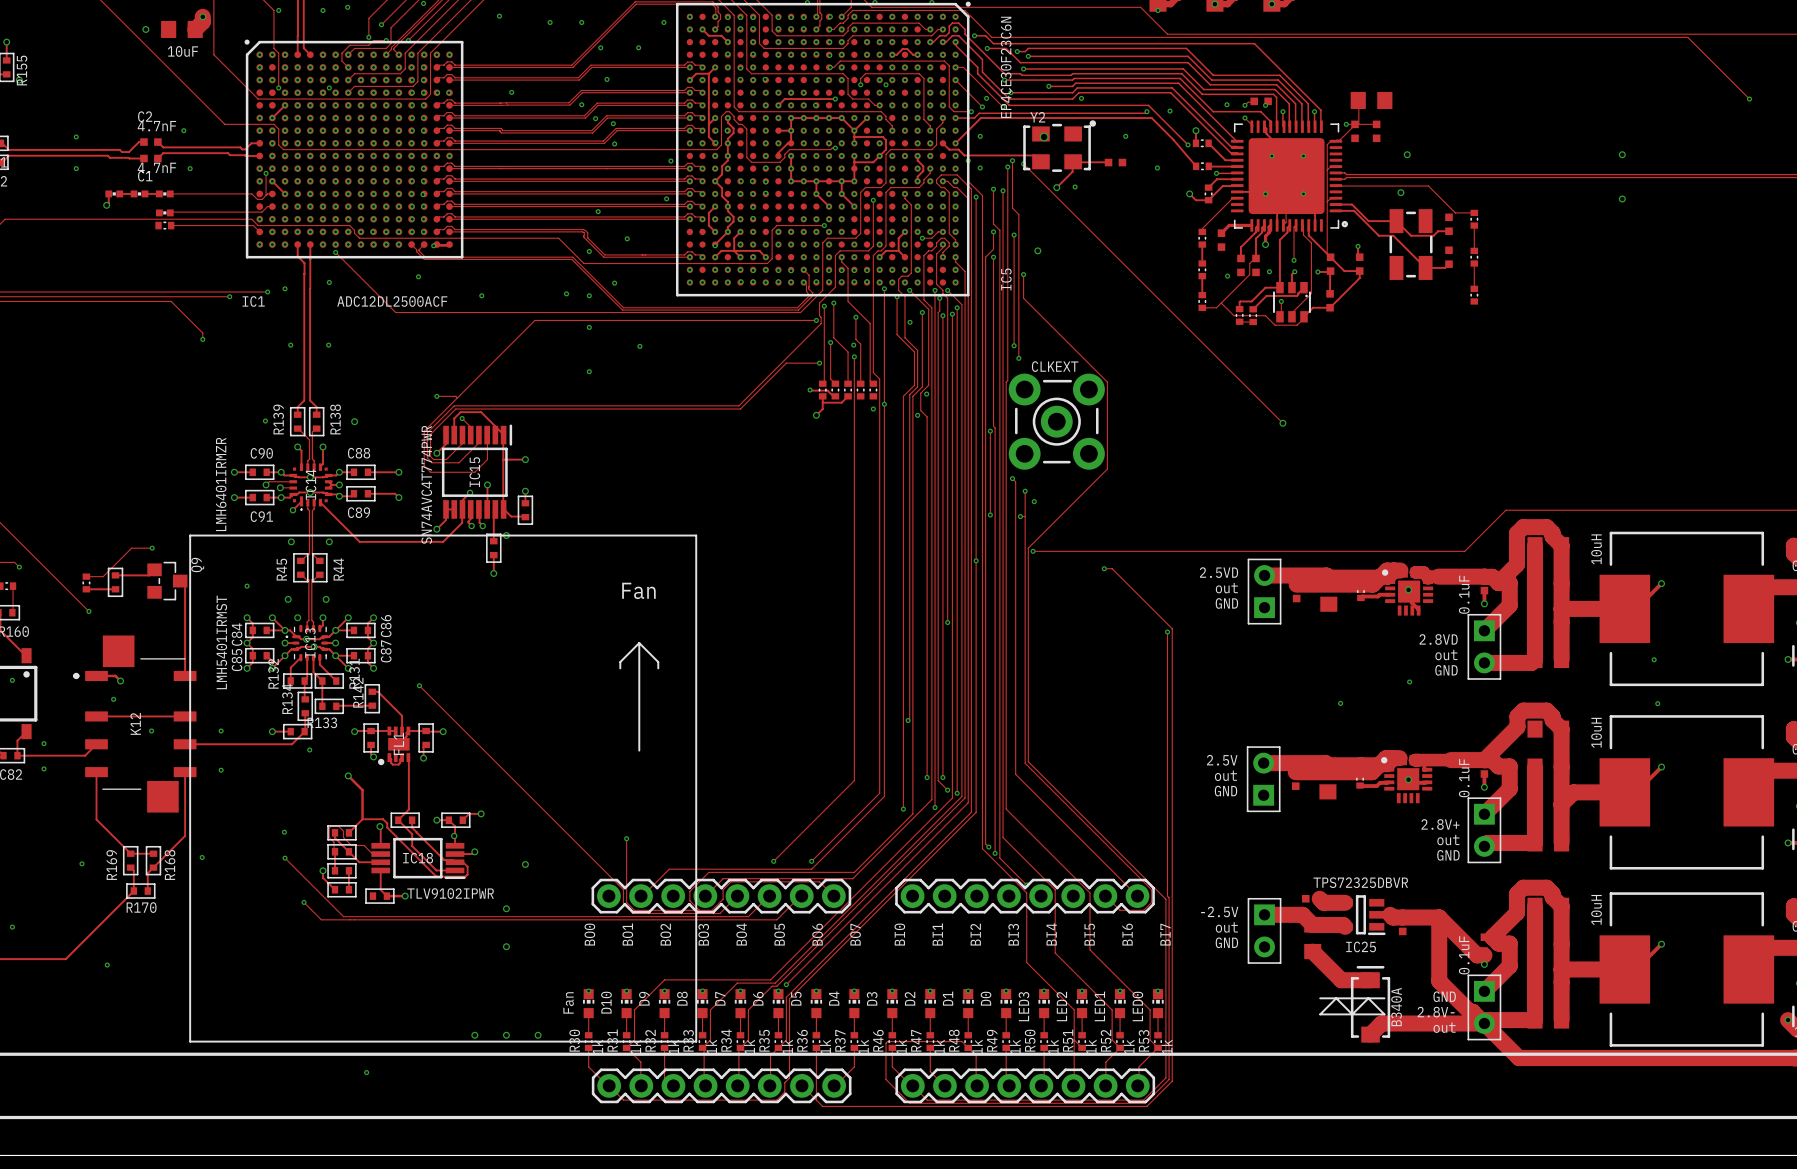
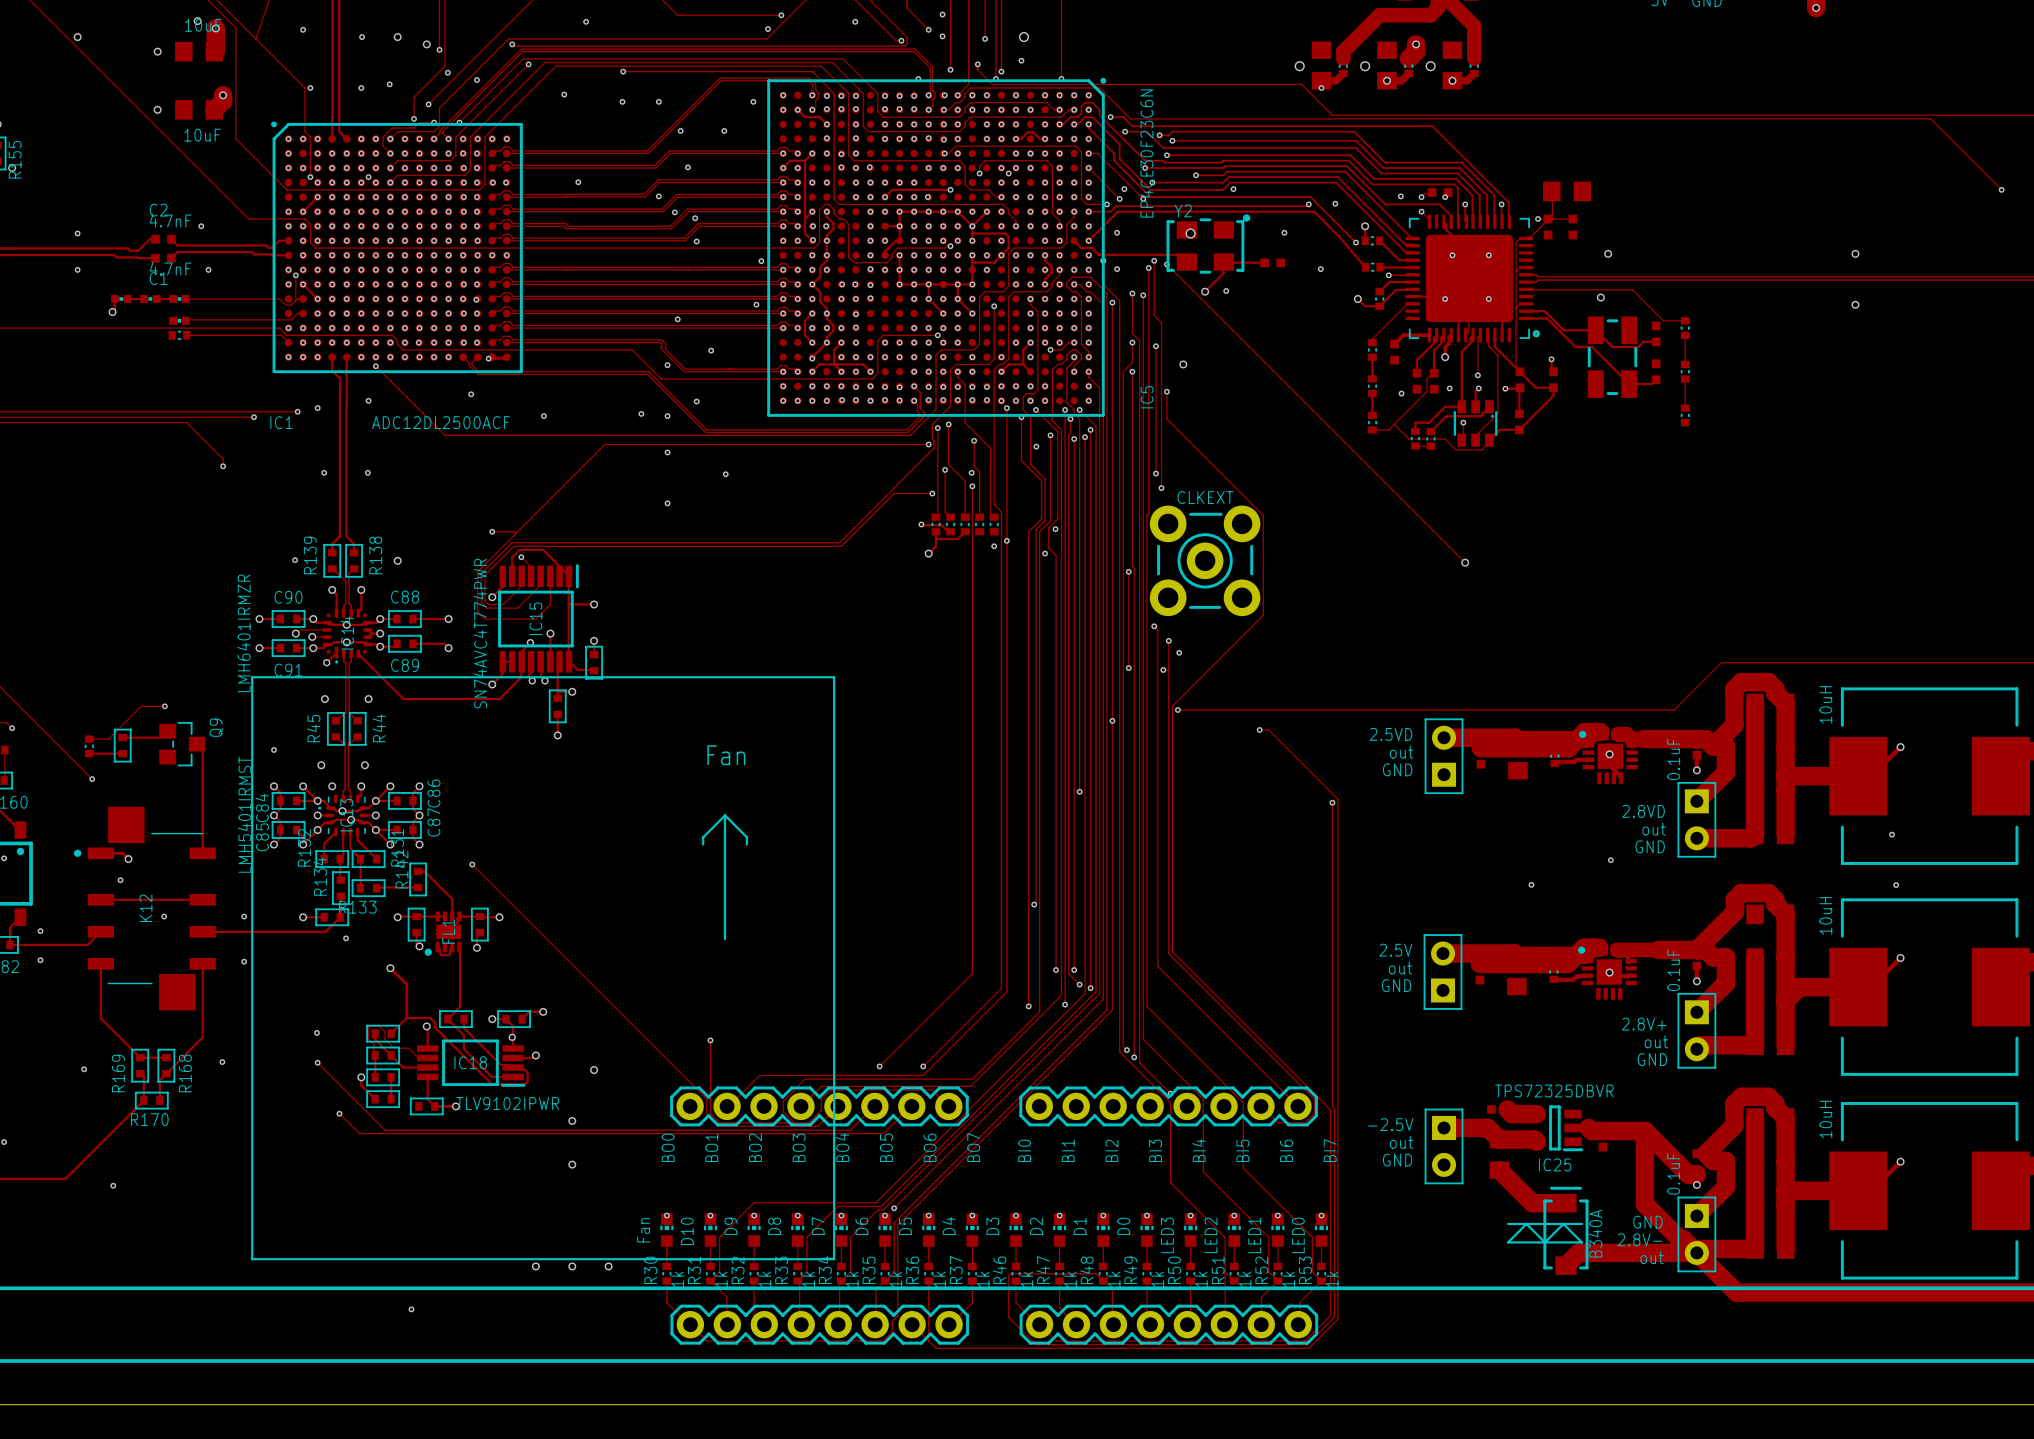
line: (190, 535) (696, 535) (696, 1041) (190, 1041) (190, 535) -> (252, 677) (834, 677) (834, 1259) (252, 1259) (252, 677)

